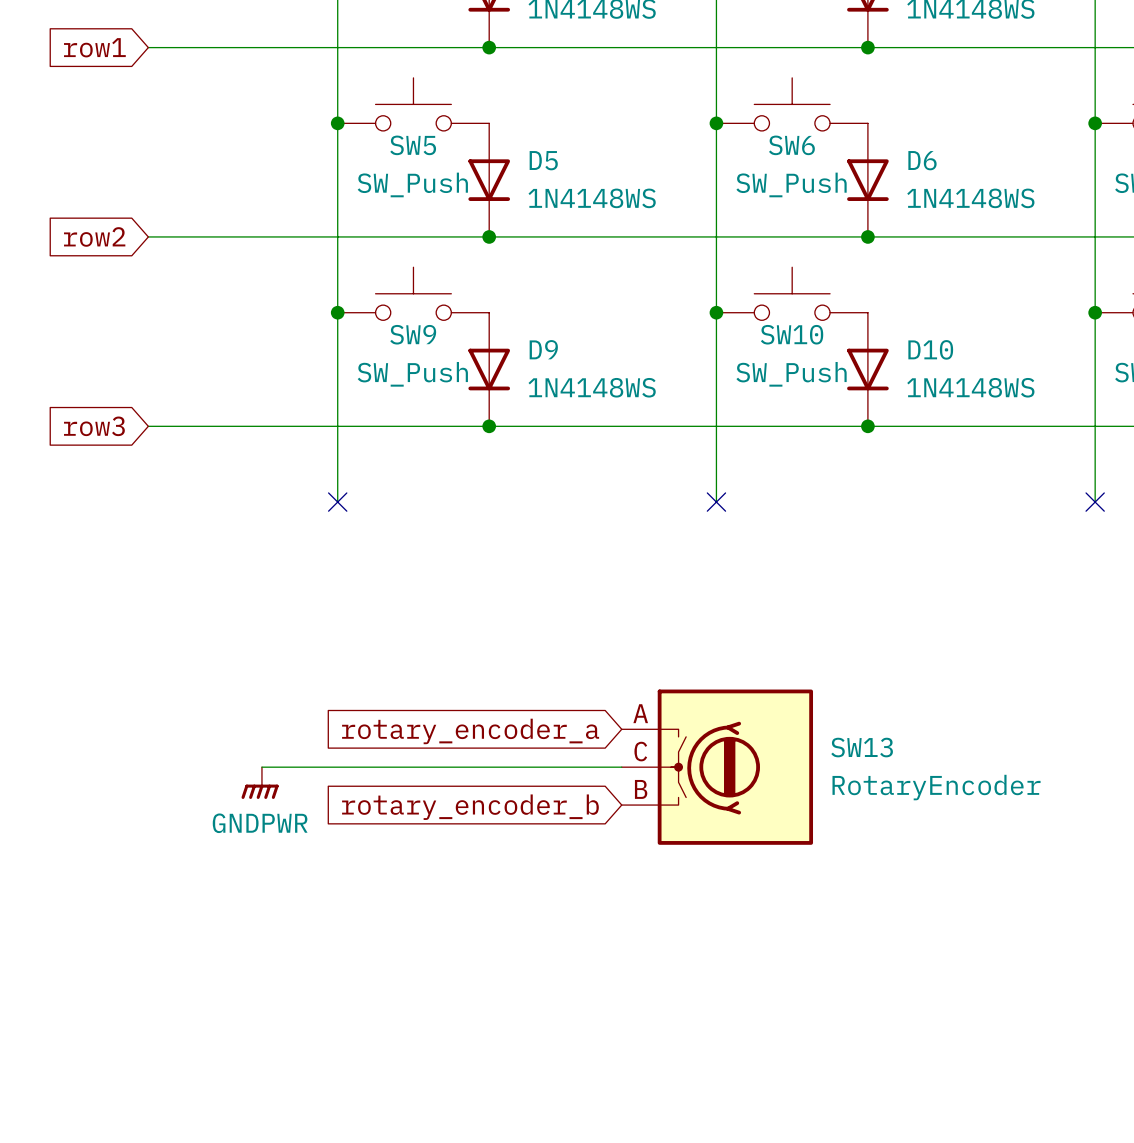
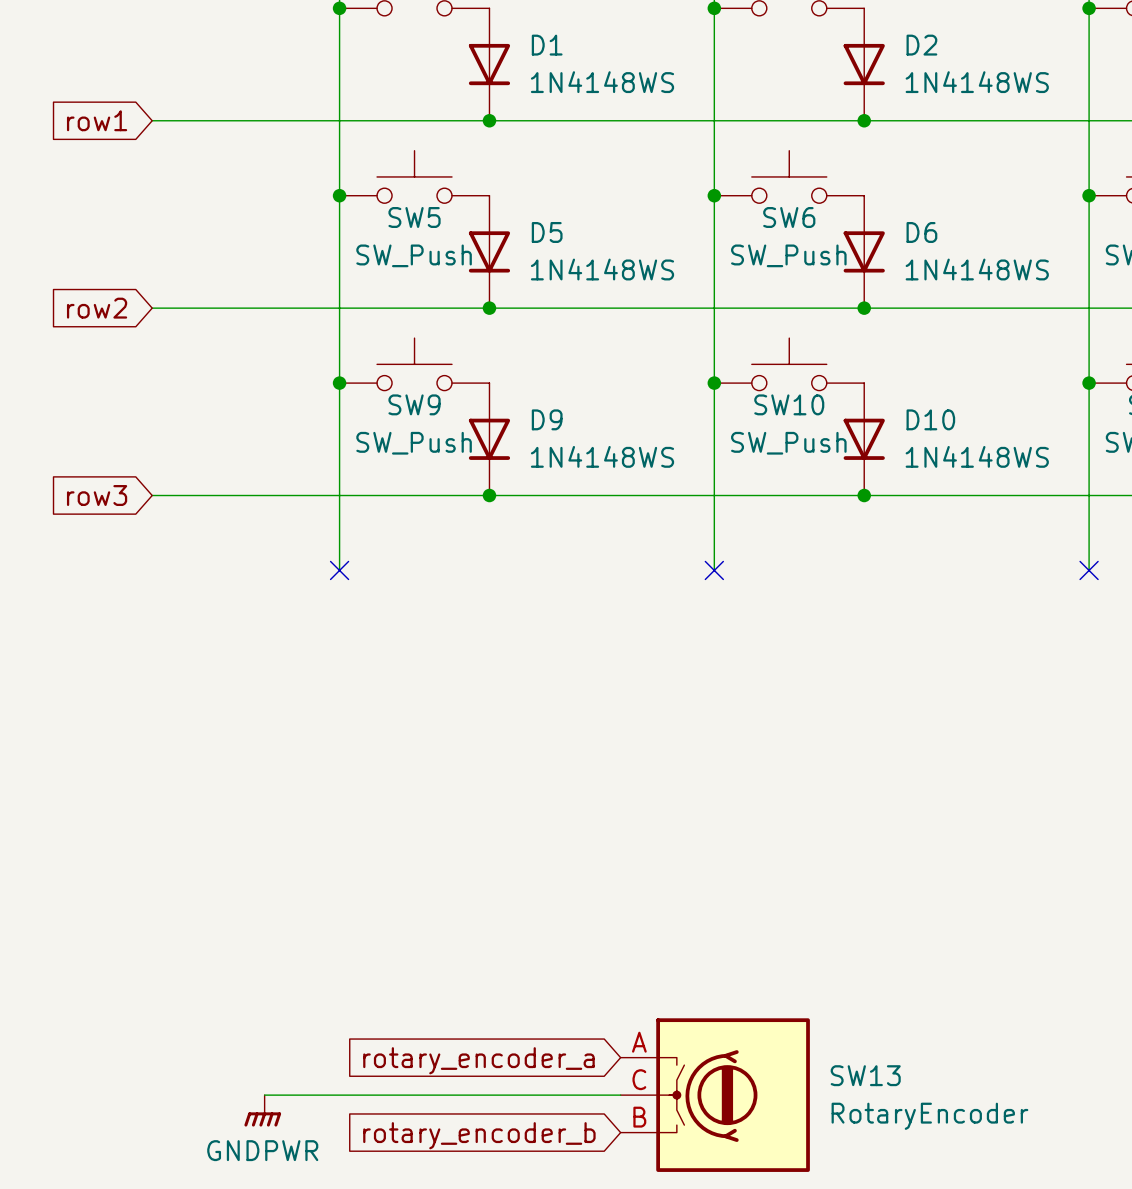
global label position: rotary_encoder_a (470, 731) -> rotary_encoder_a (478, 1060)
wire: (261, 767) (621, 767) -> (264, 1095) (620, 1095)
SW13 position: (717, 767) -> (715, 1095)
power symbol position: GNDPWR (260, 783) -> GNDPWR (262, 1110)
global label position: rotary_encoder_b (470, 807) -> rotary_encoder_b (479, 1135)

